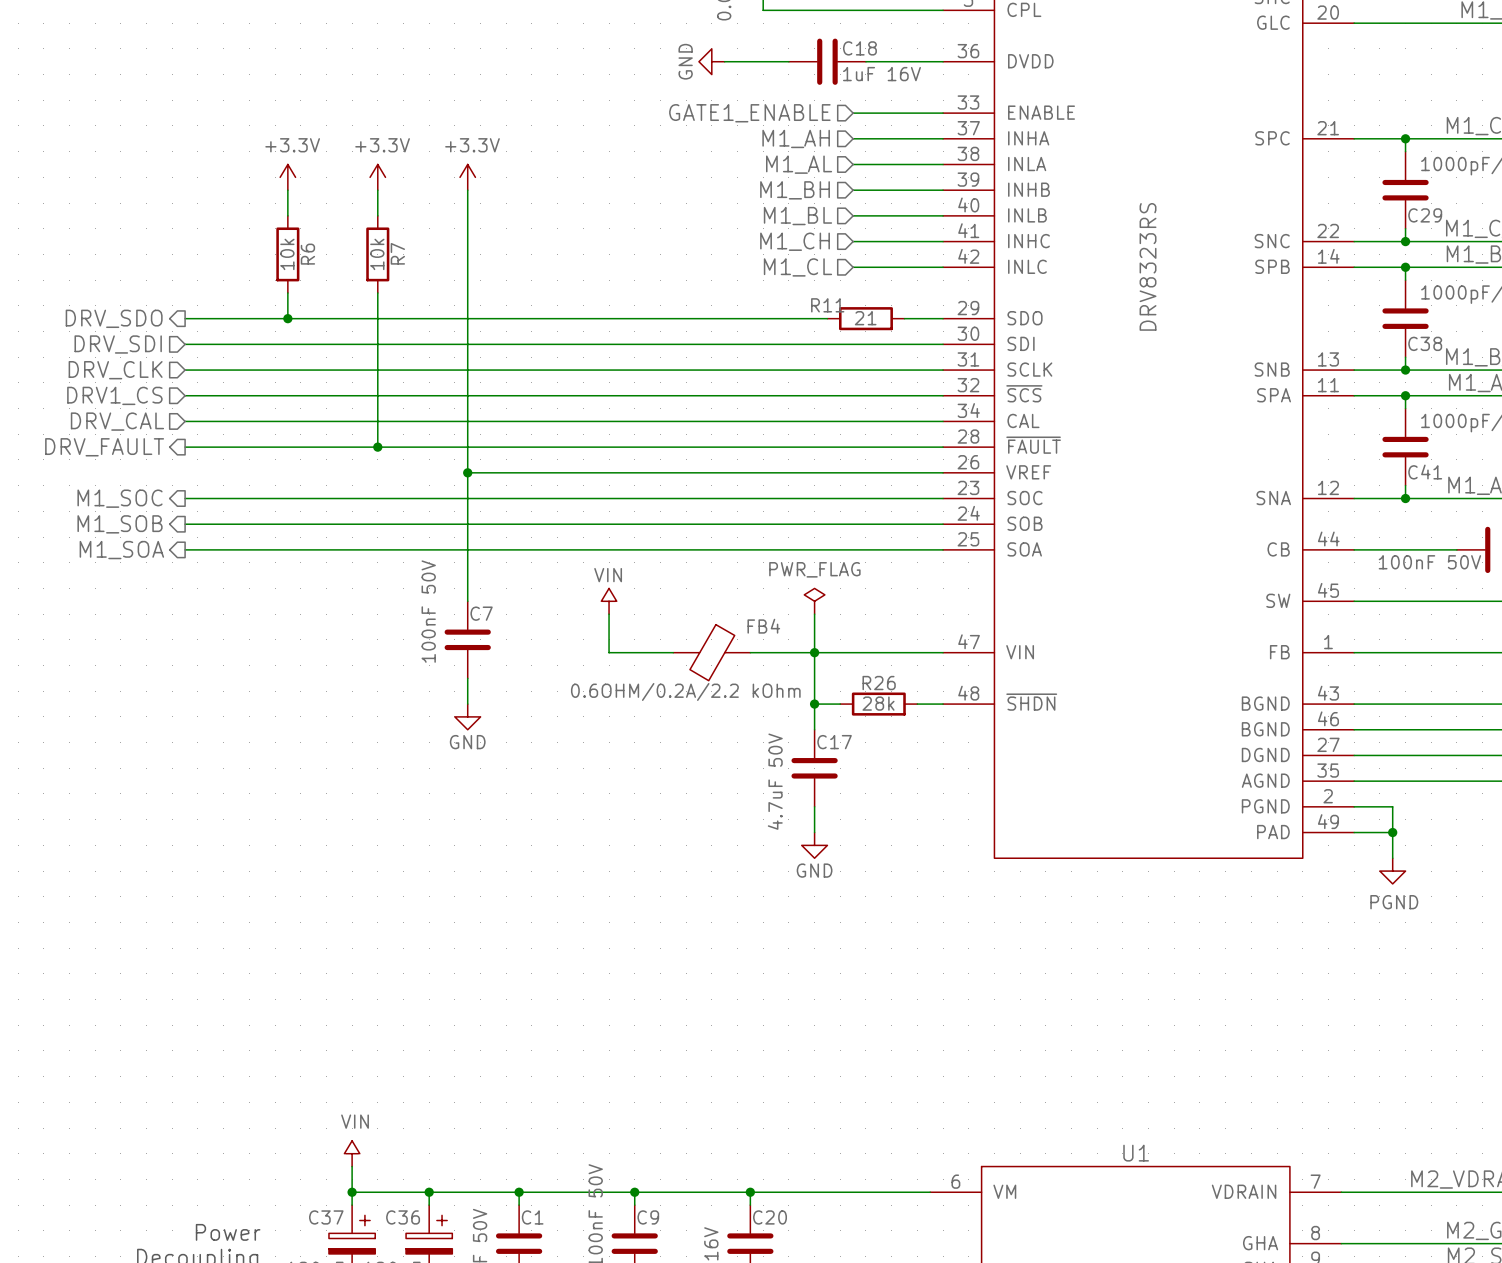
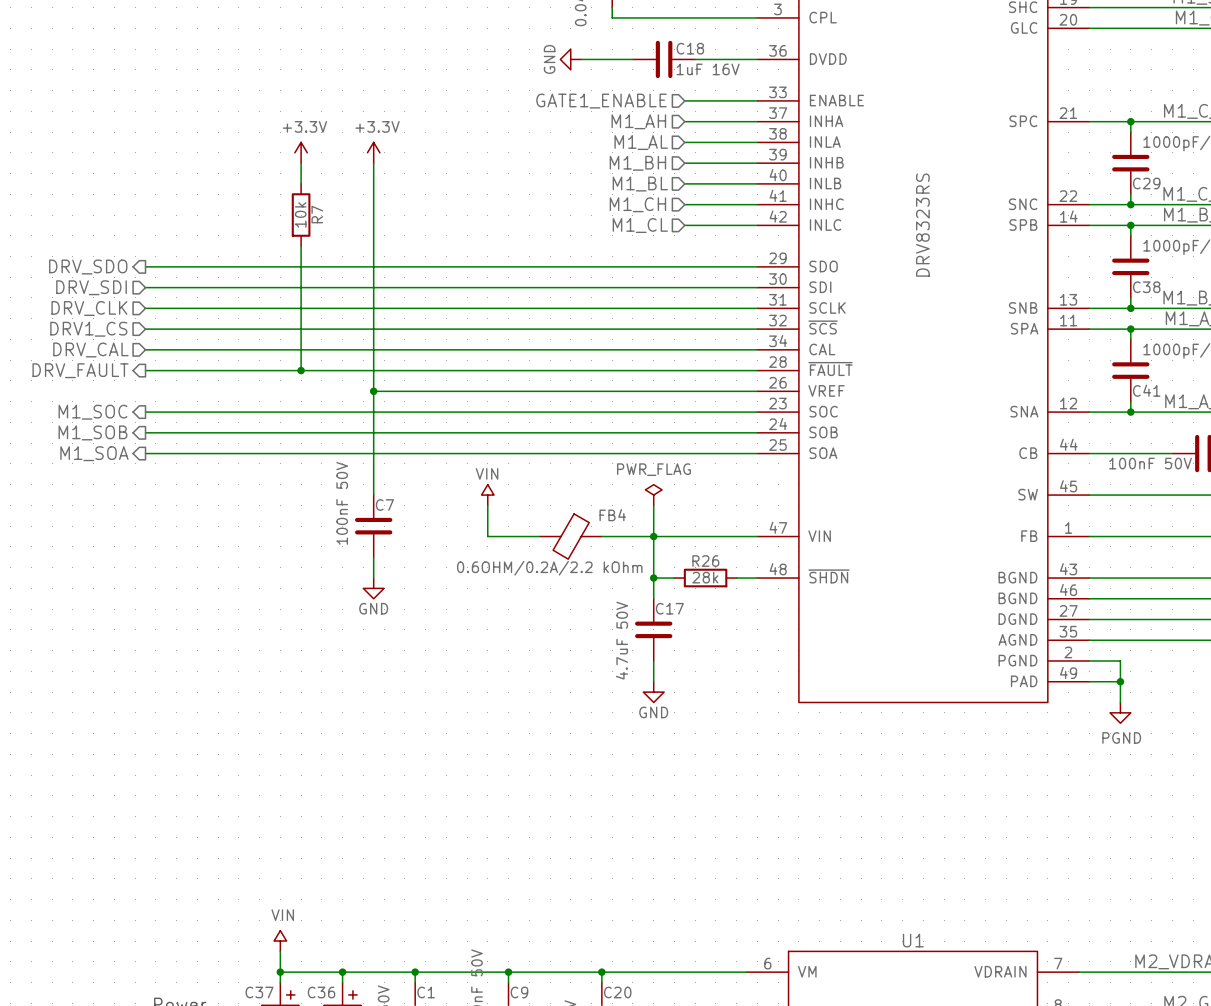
power symbol: +3.3V (287, 177) -> none
wire: (287, 190) (287, 215) -> none
R6: 10k (287, 254) -> none
wire: (287, 292) (287, 318) -> none
junction: (287, 318) -> none
wire: none -> (664, 266) (726, 266)
R11: 21 (865, 318) -> none

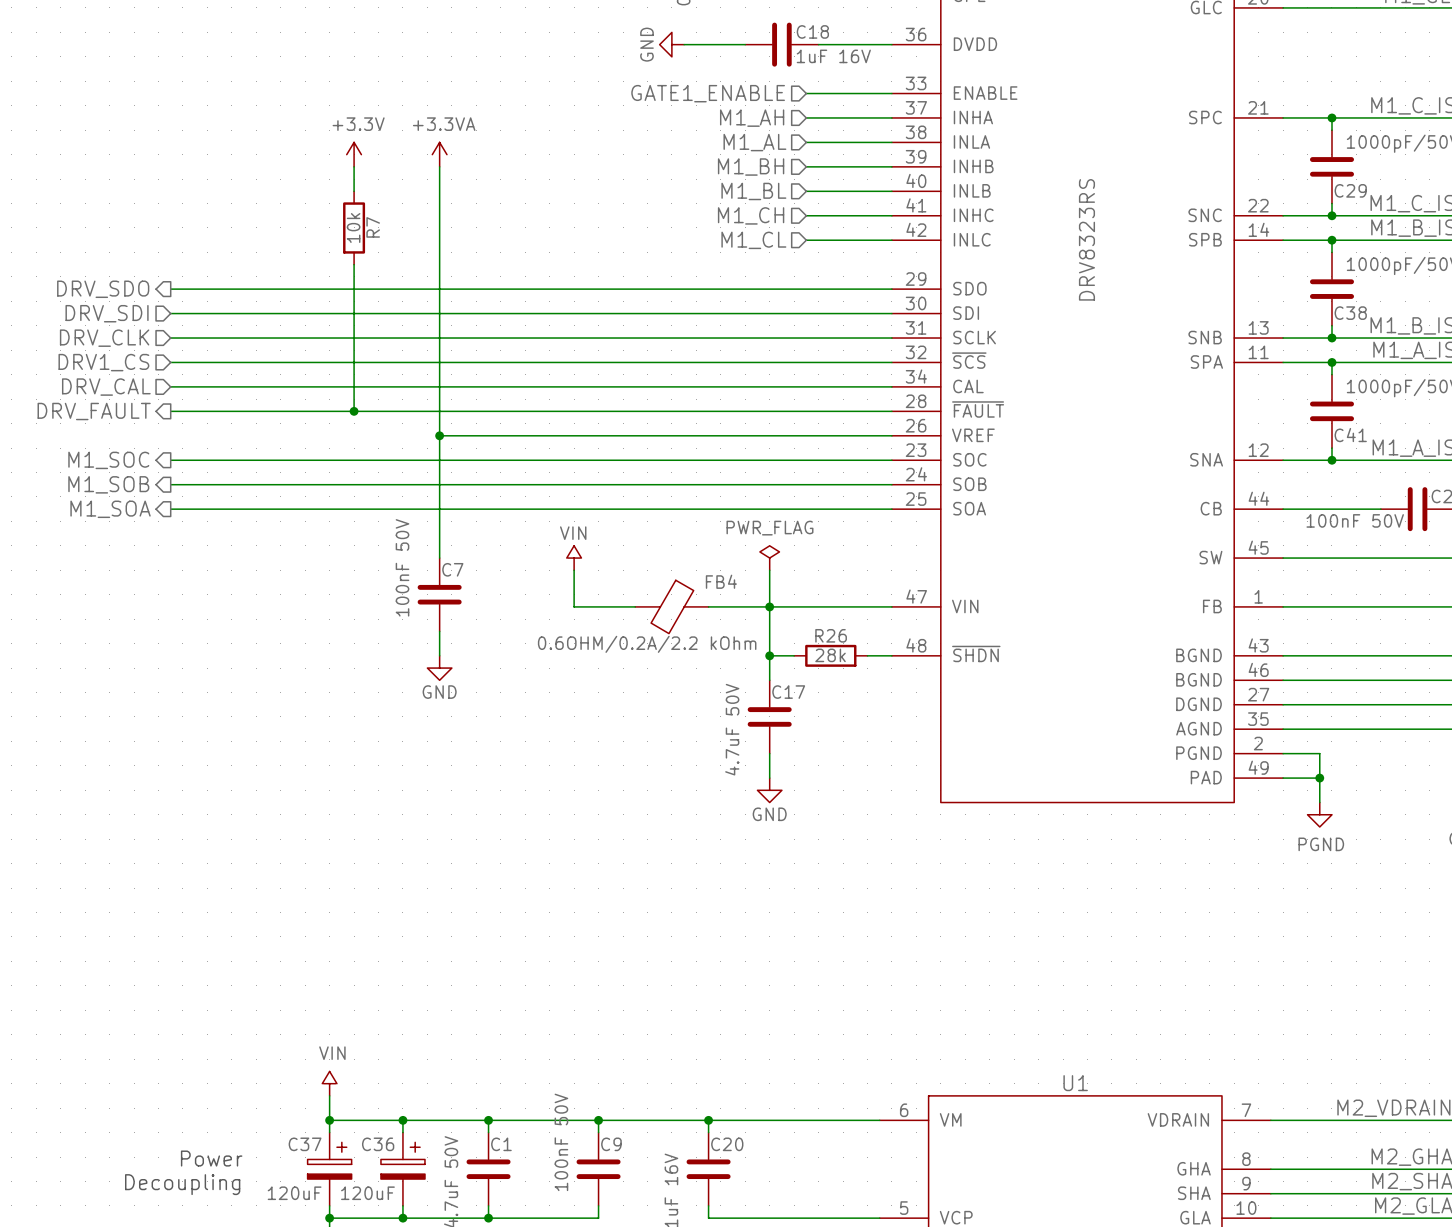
power symbol: +3.3V (373, 152) -> +3.3VA (439, 154)

